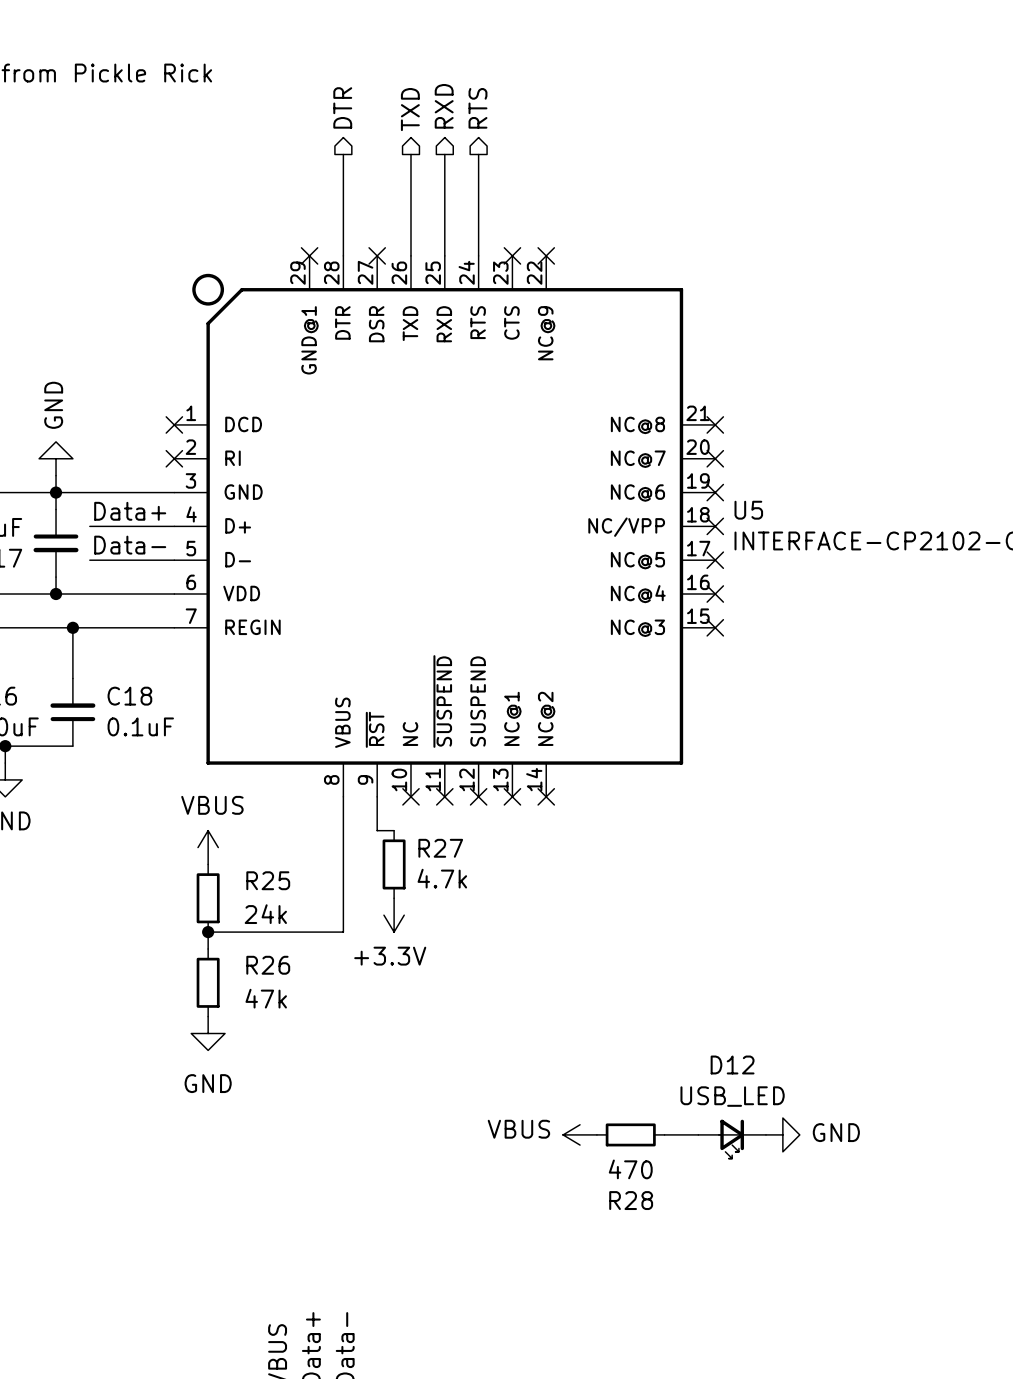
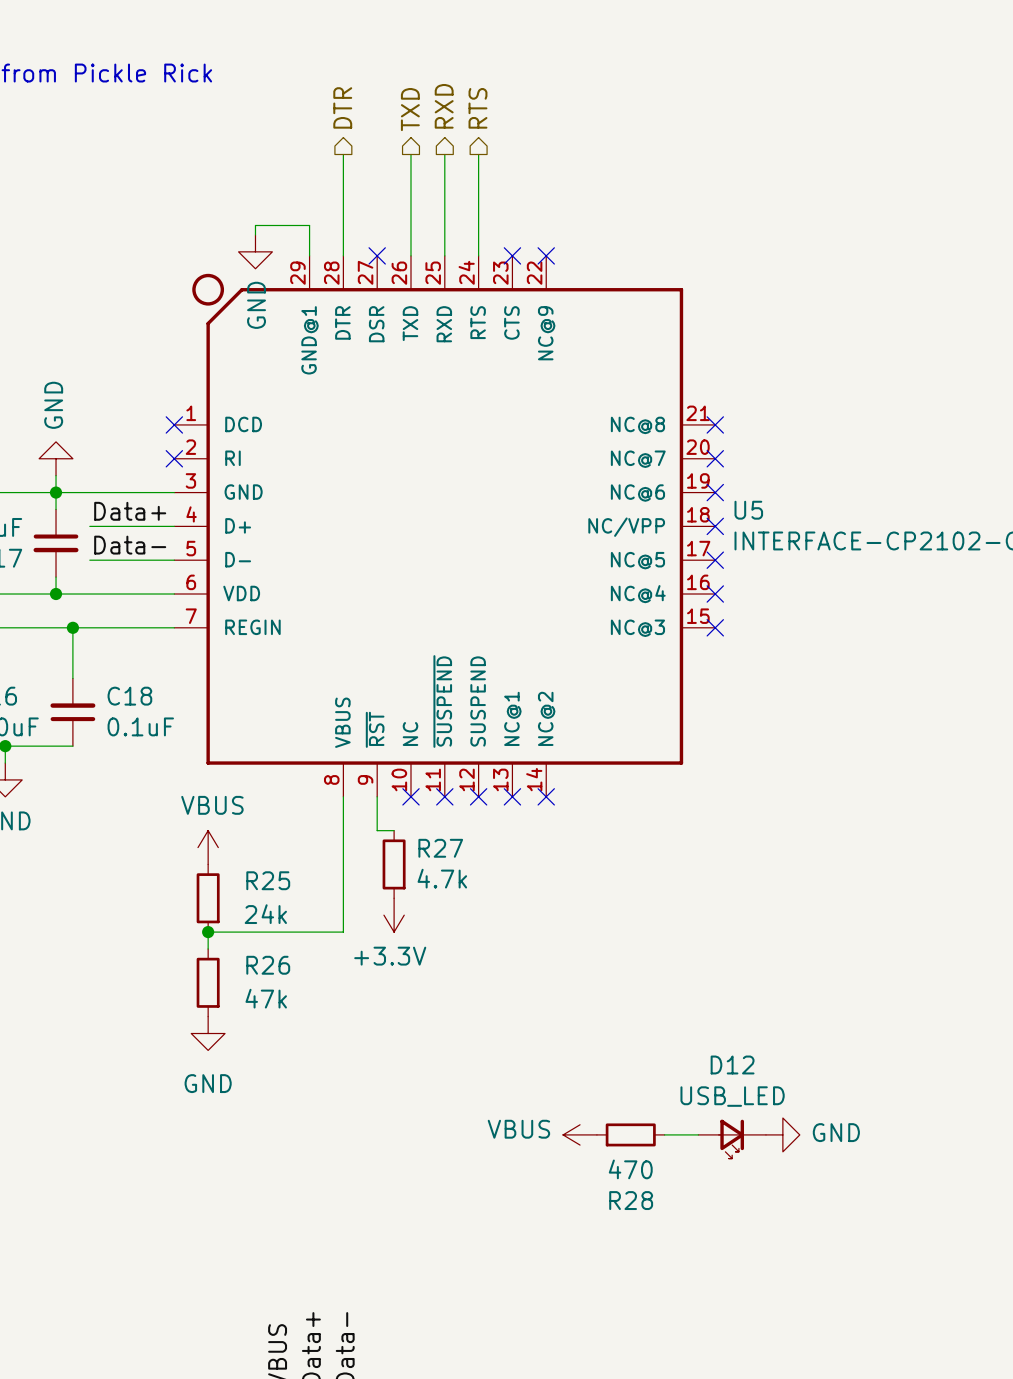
wire: none -> (255, 234) (255, 225) (309, 225) (309, 255)
power symbol: none -> GND (255, 251)
no-connect mark: (309, 255) -> none

